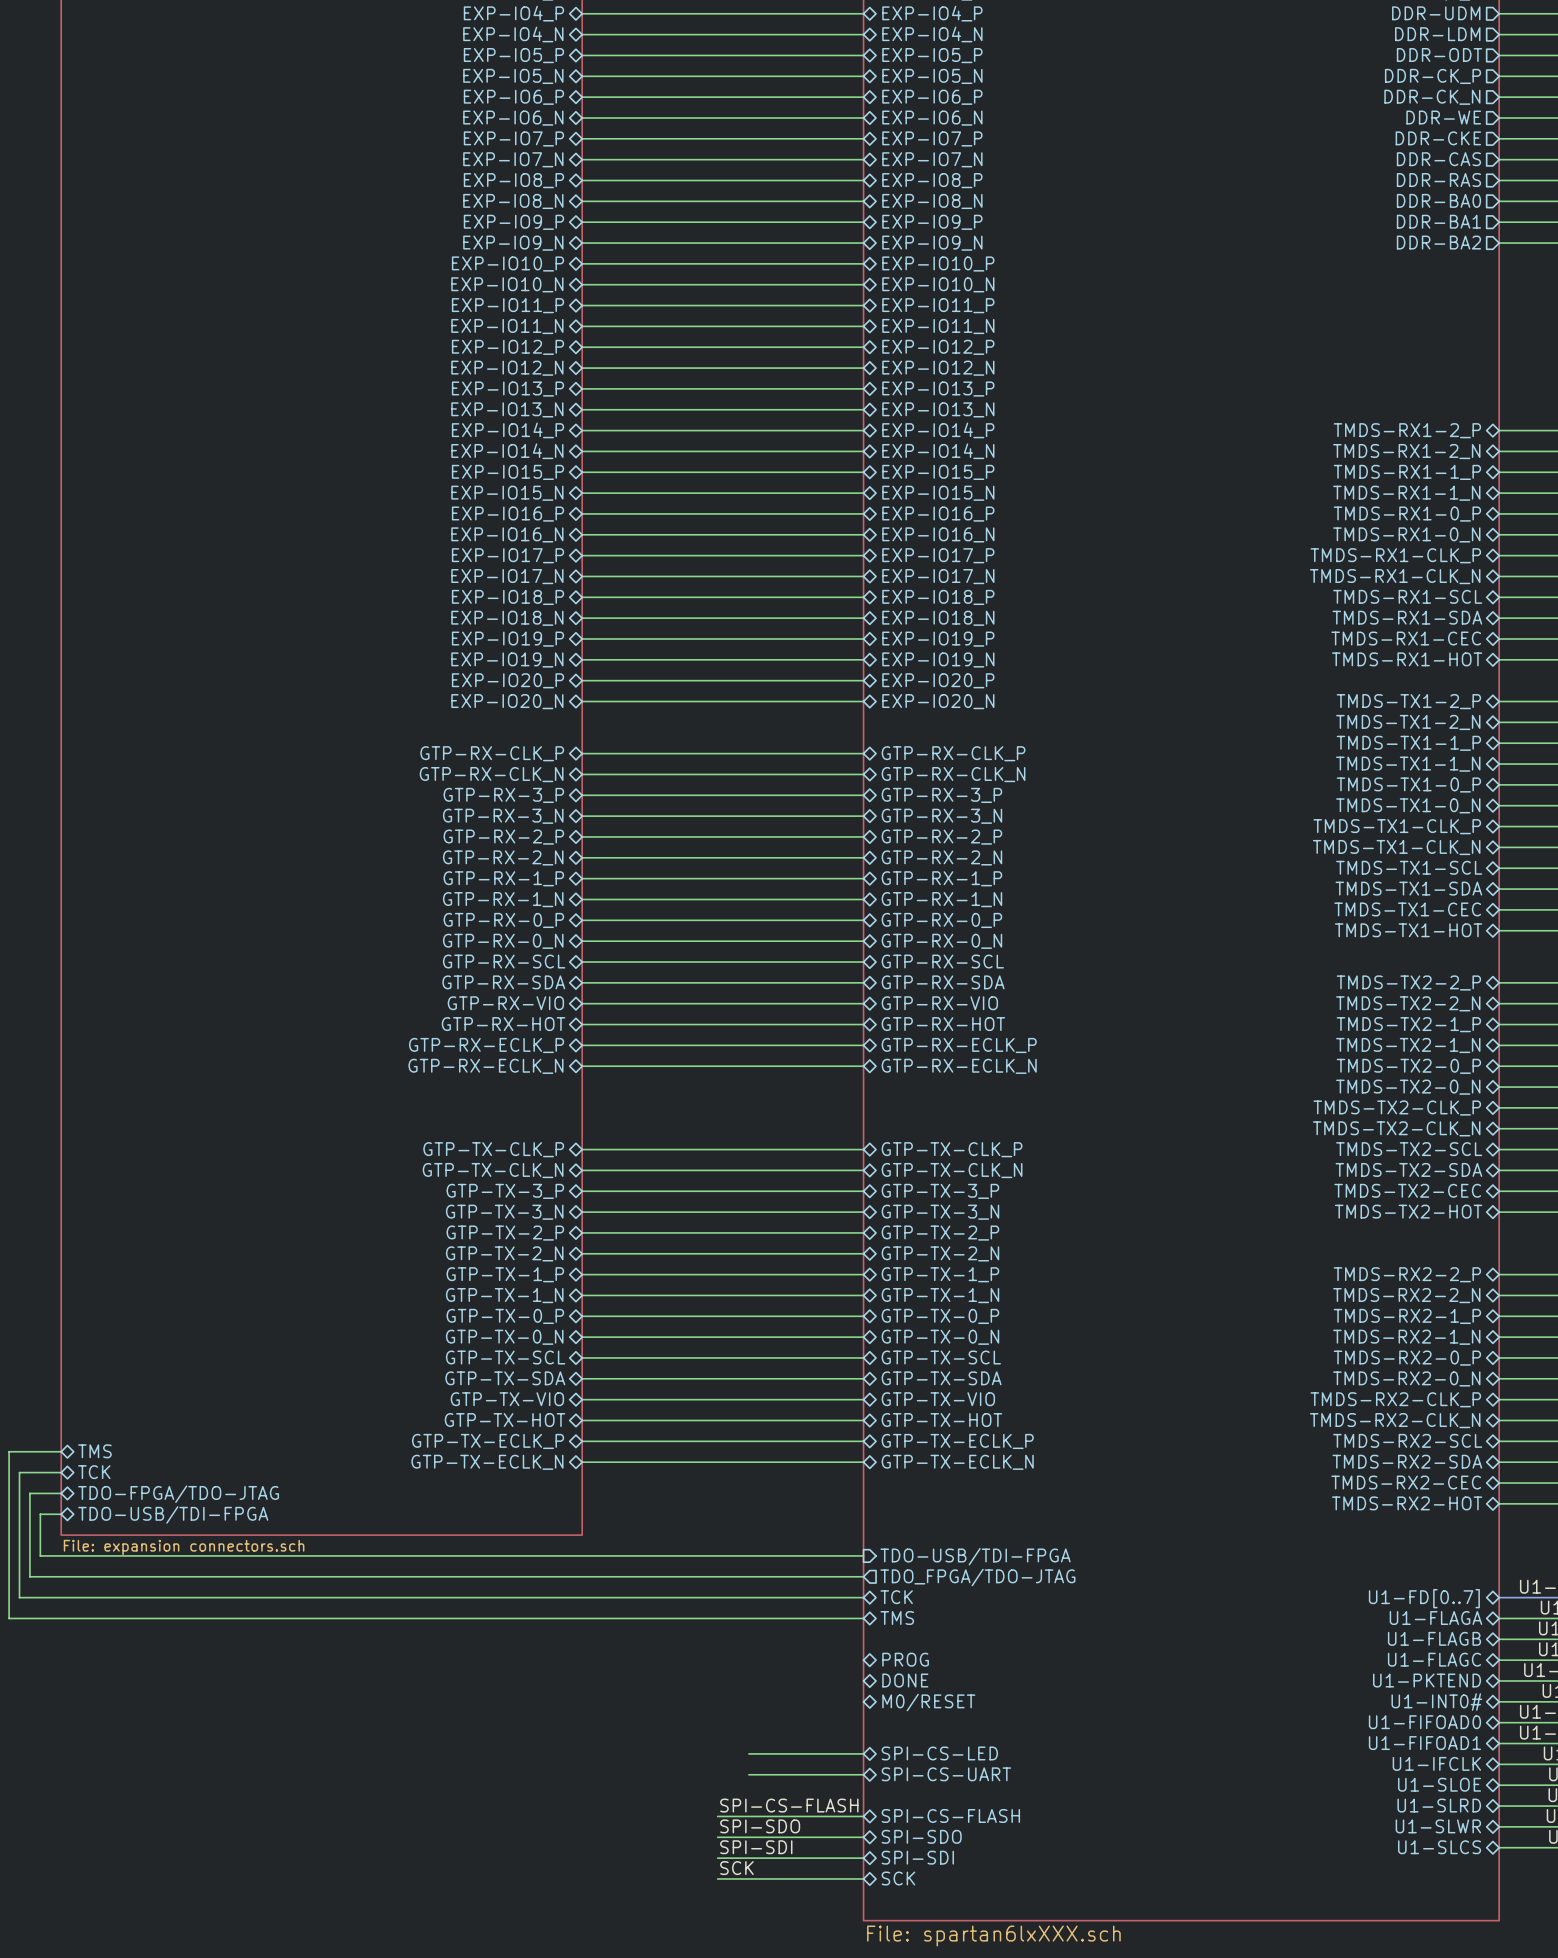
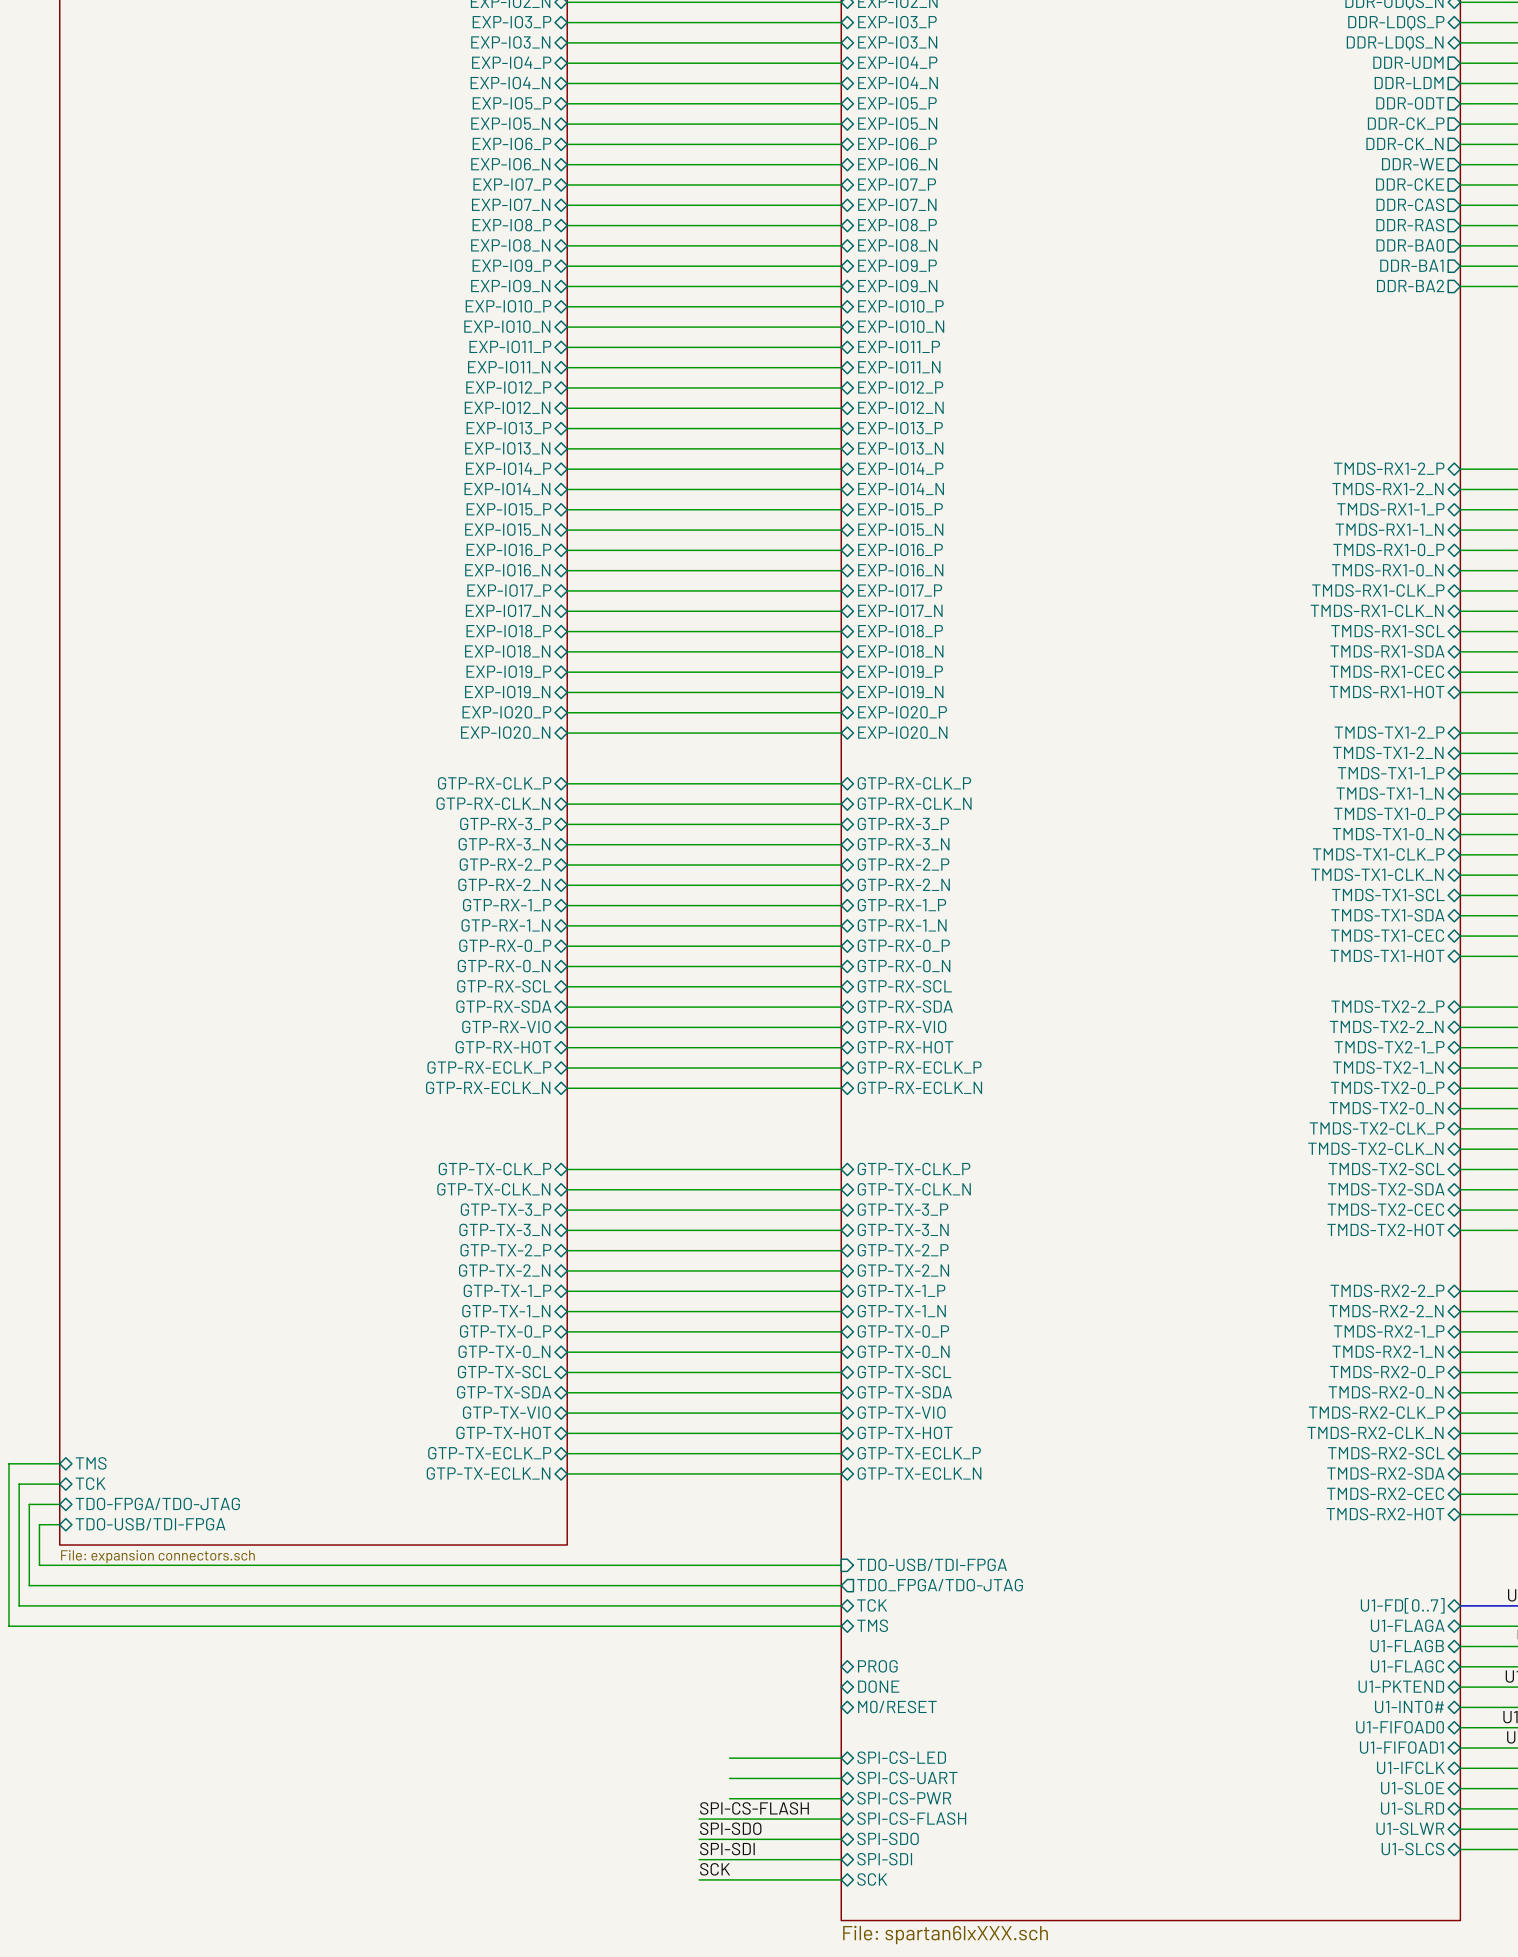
wire: none -> (729, 1798) (841, 1798)
sheet pin: none -> SPI-CS-PWR (904, 1798)

